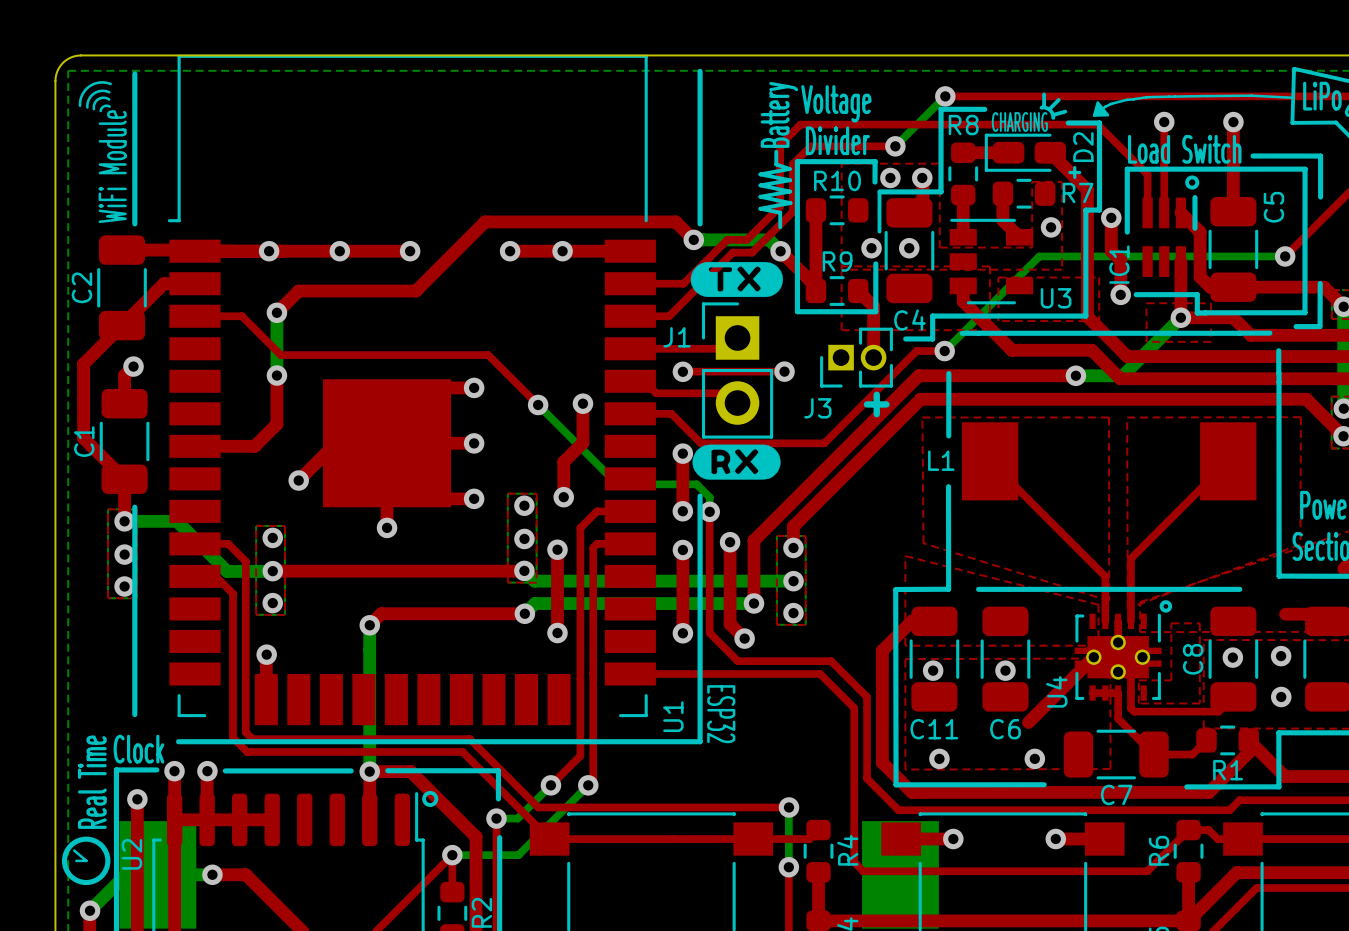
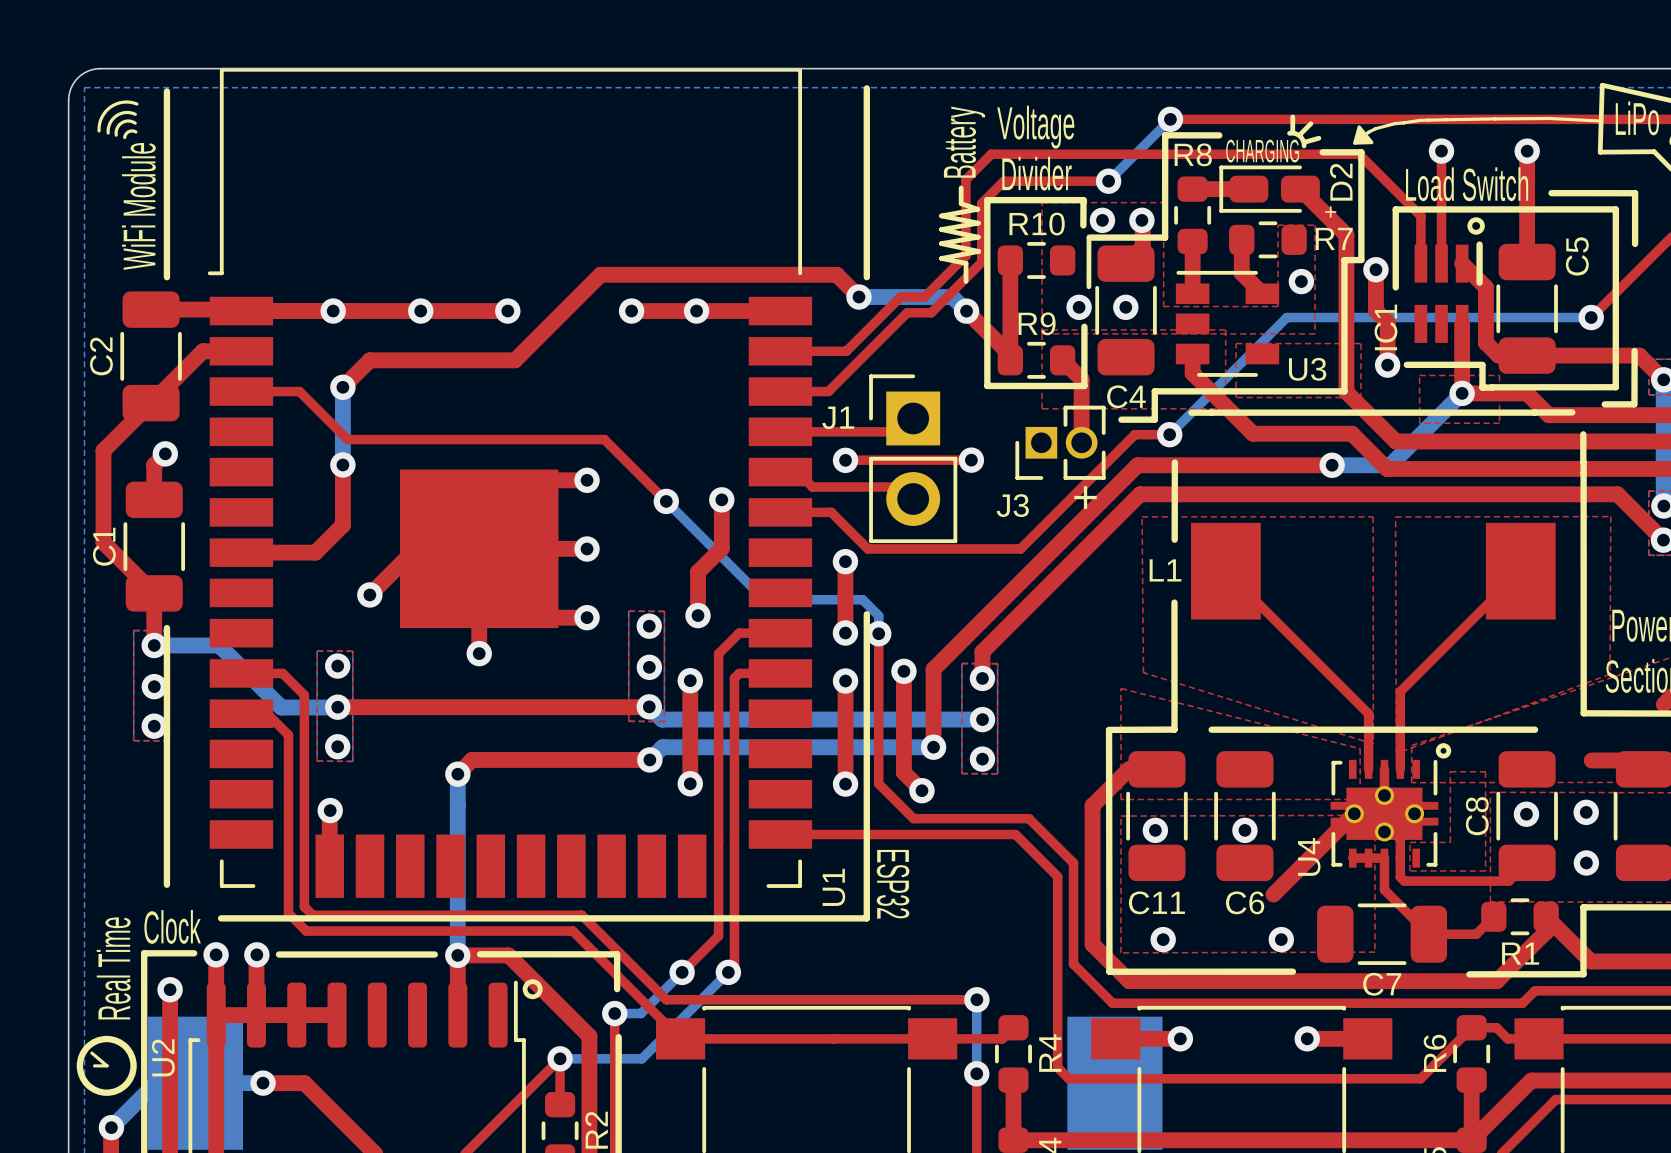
drawing: [690, 261, 783, 298] -> none
drawing: [692, 444, 781, 480] -> none

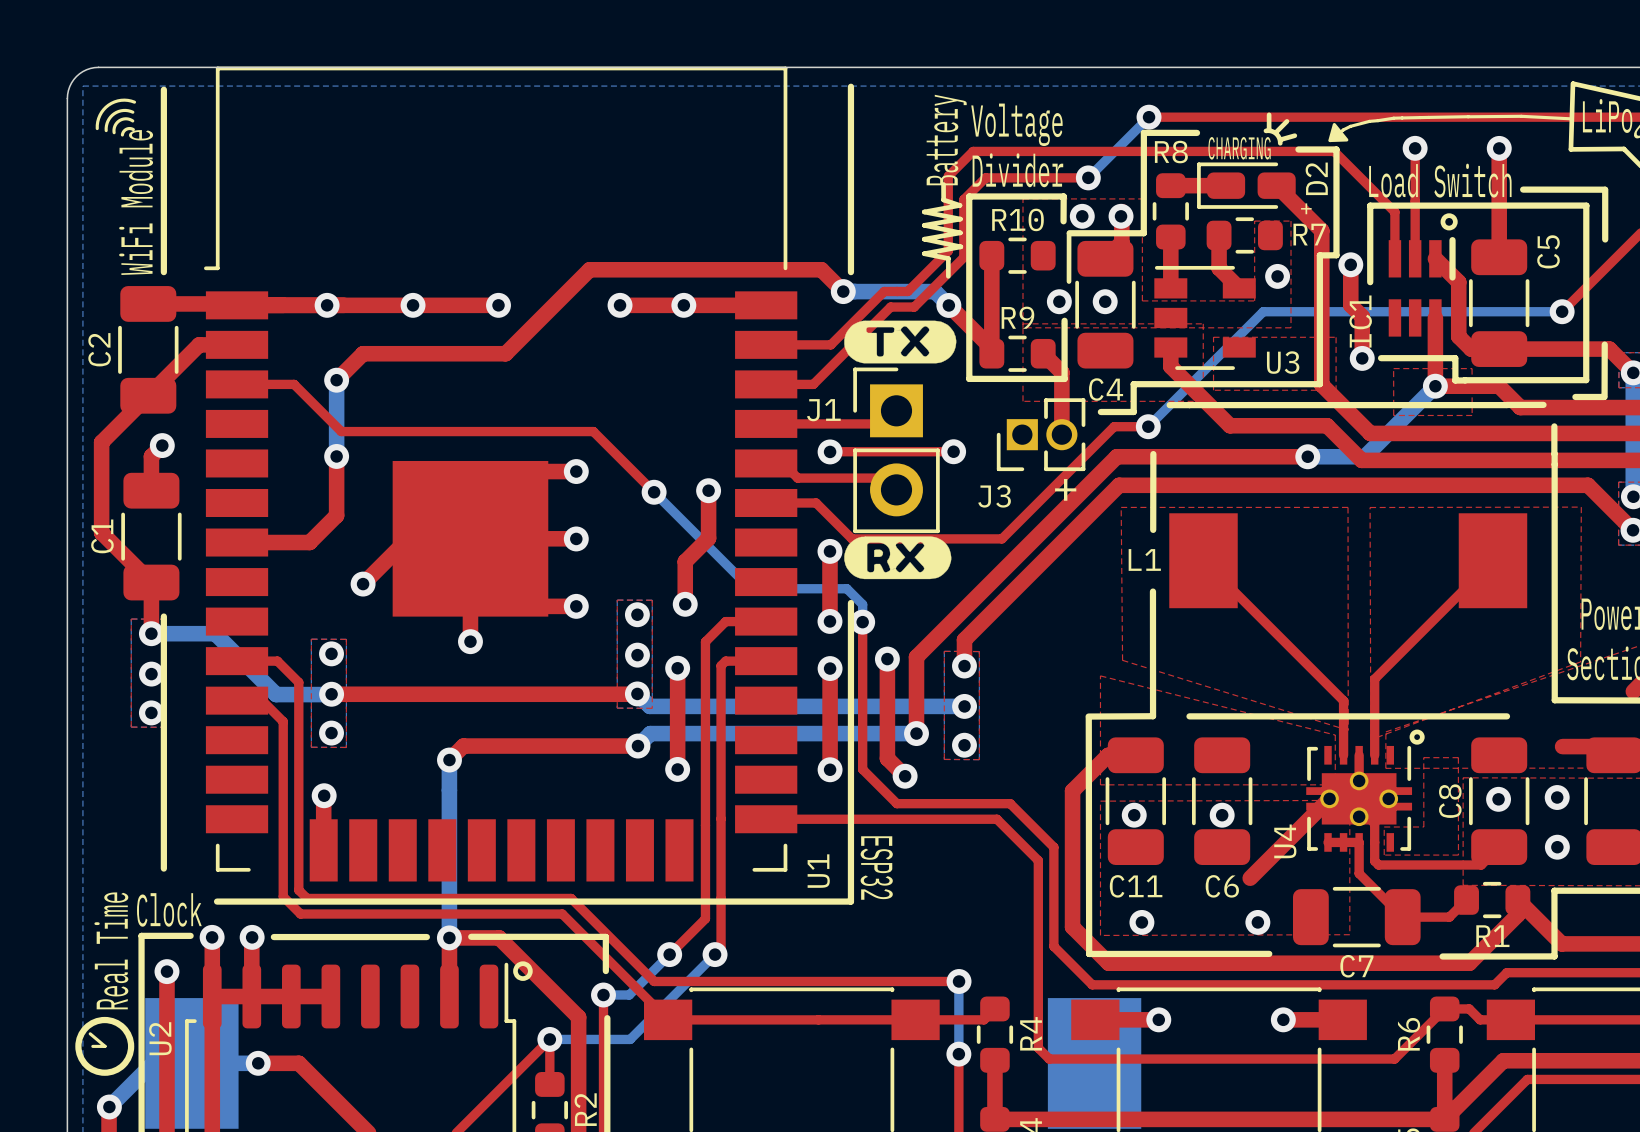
drawing: none -> [844, 320, 957, 364]
drawing: none -> [844, 536, 952, 580]

